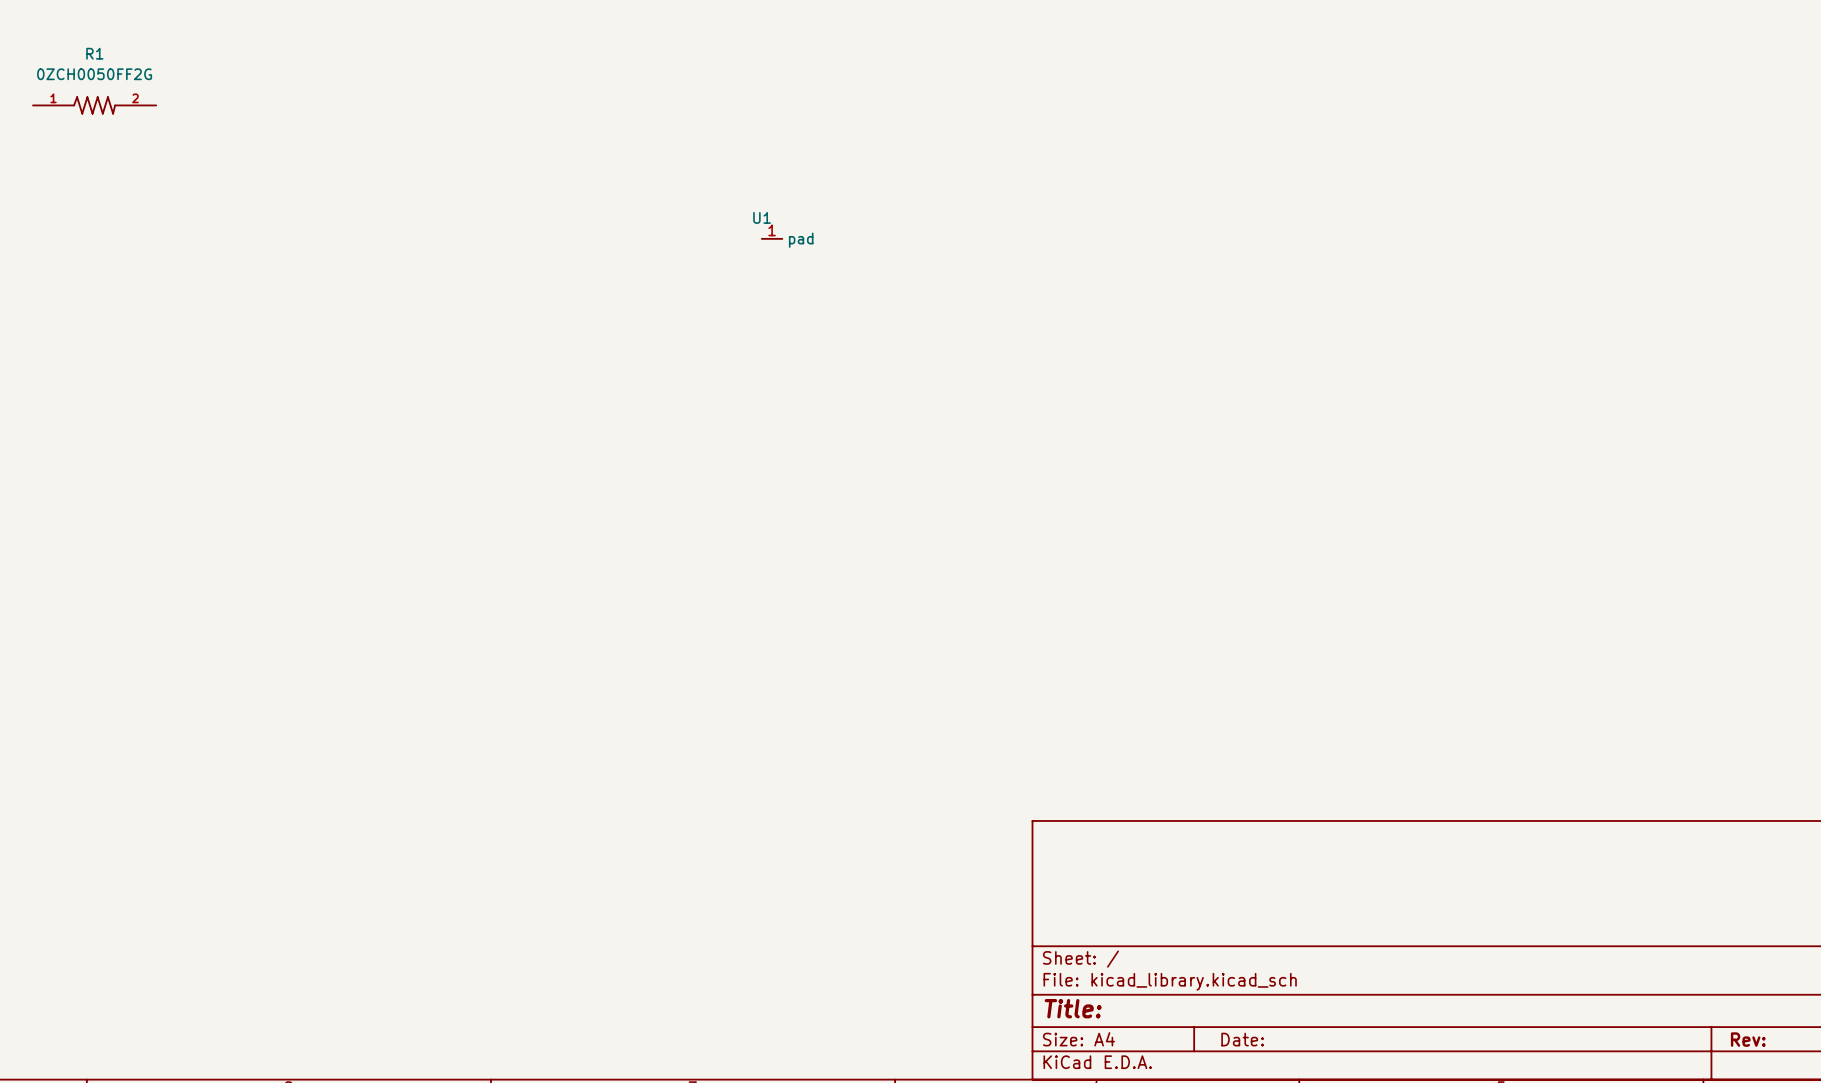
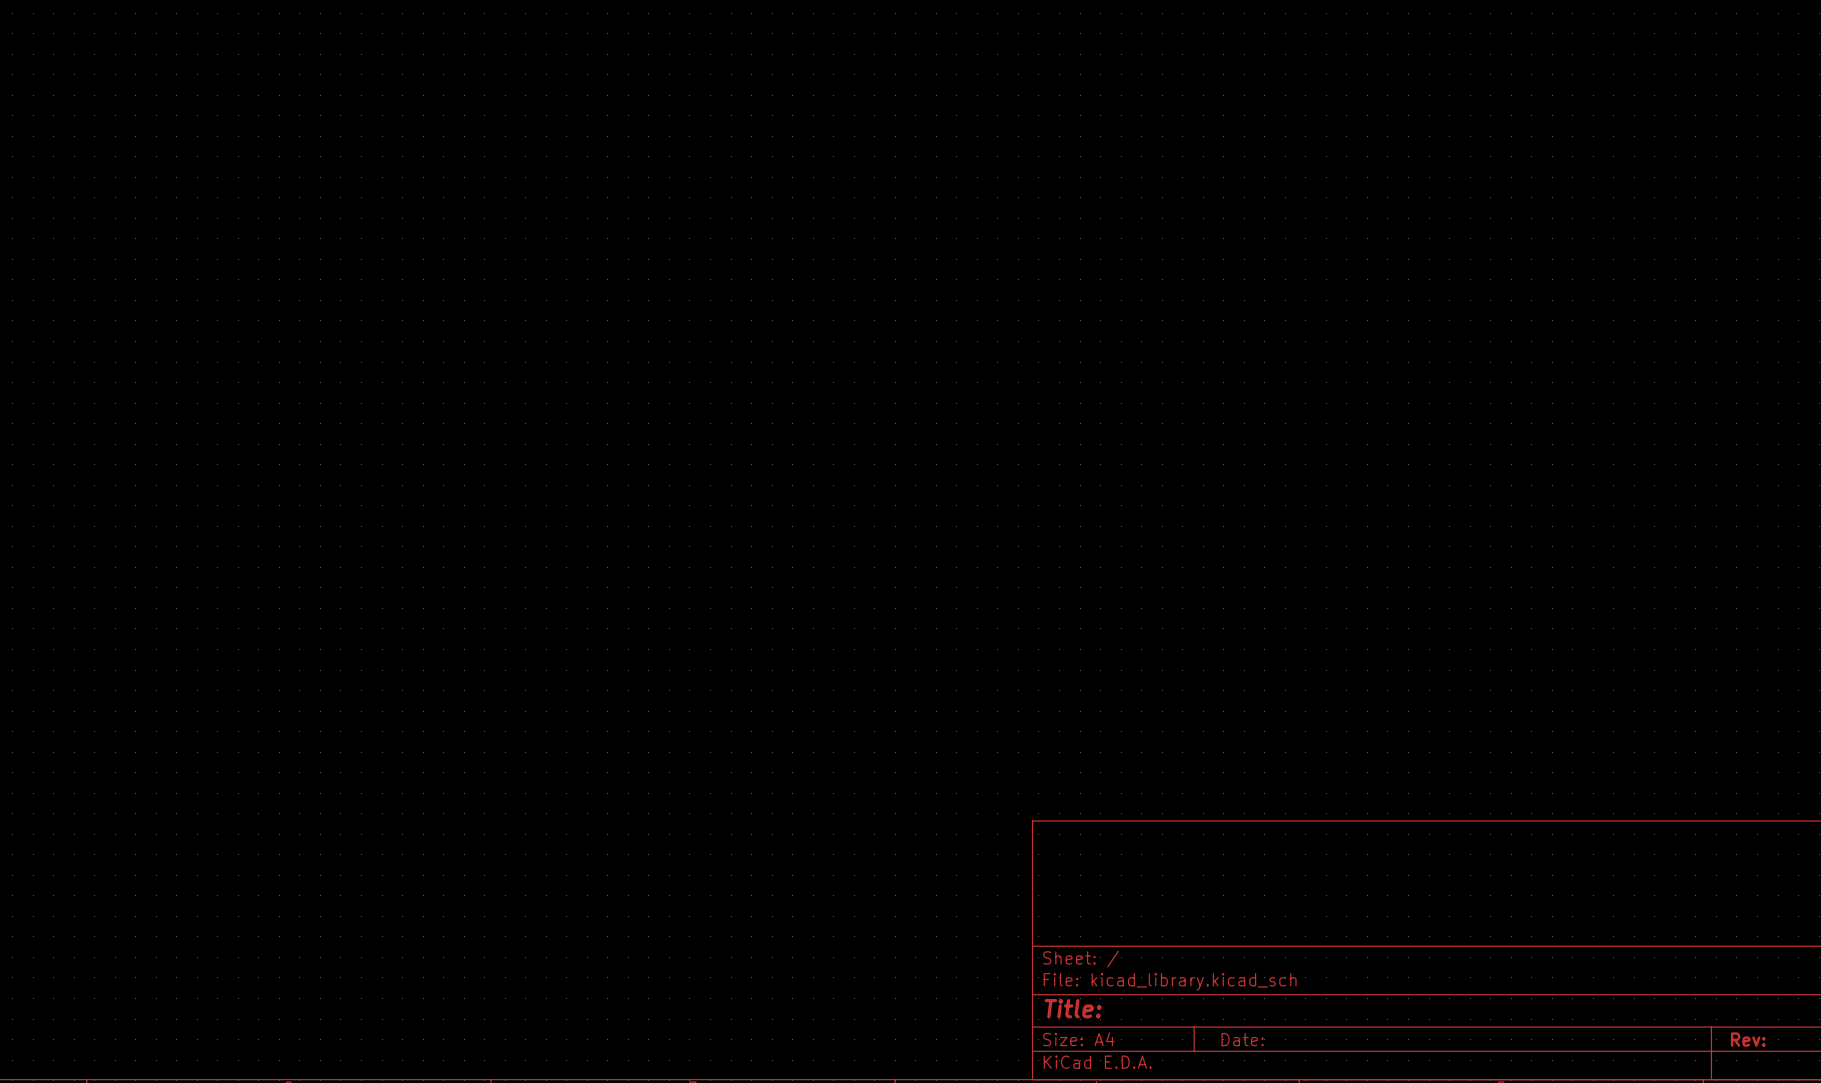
R1: 0ZCH0050FF2G (94, 105) -> none
U1: (772, 238) -> none

